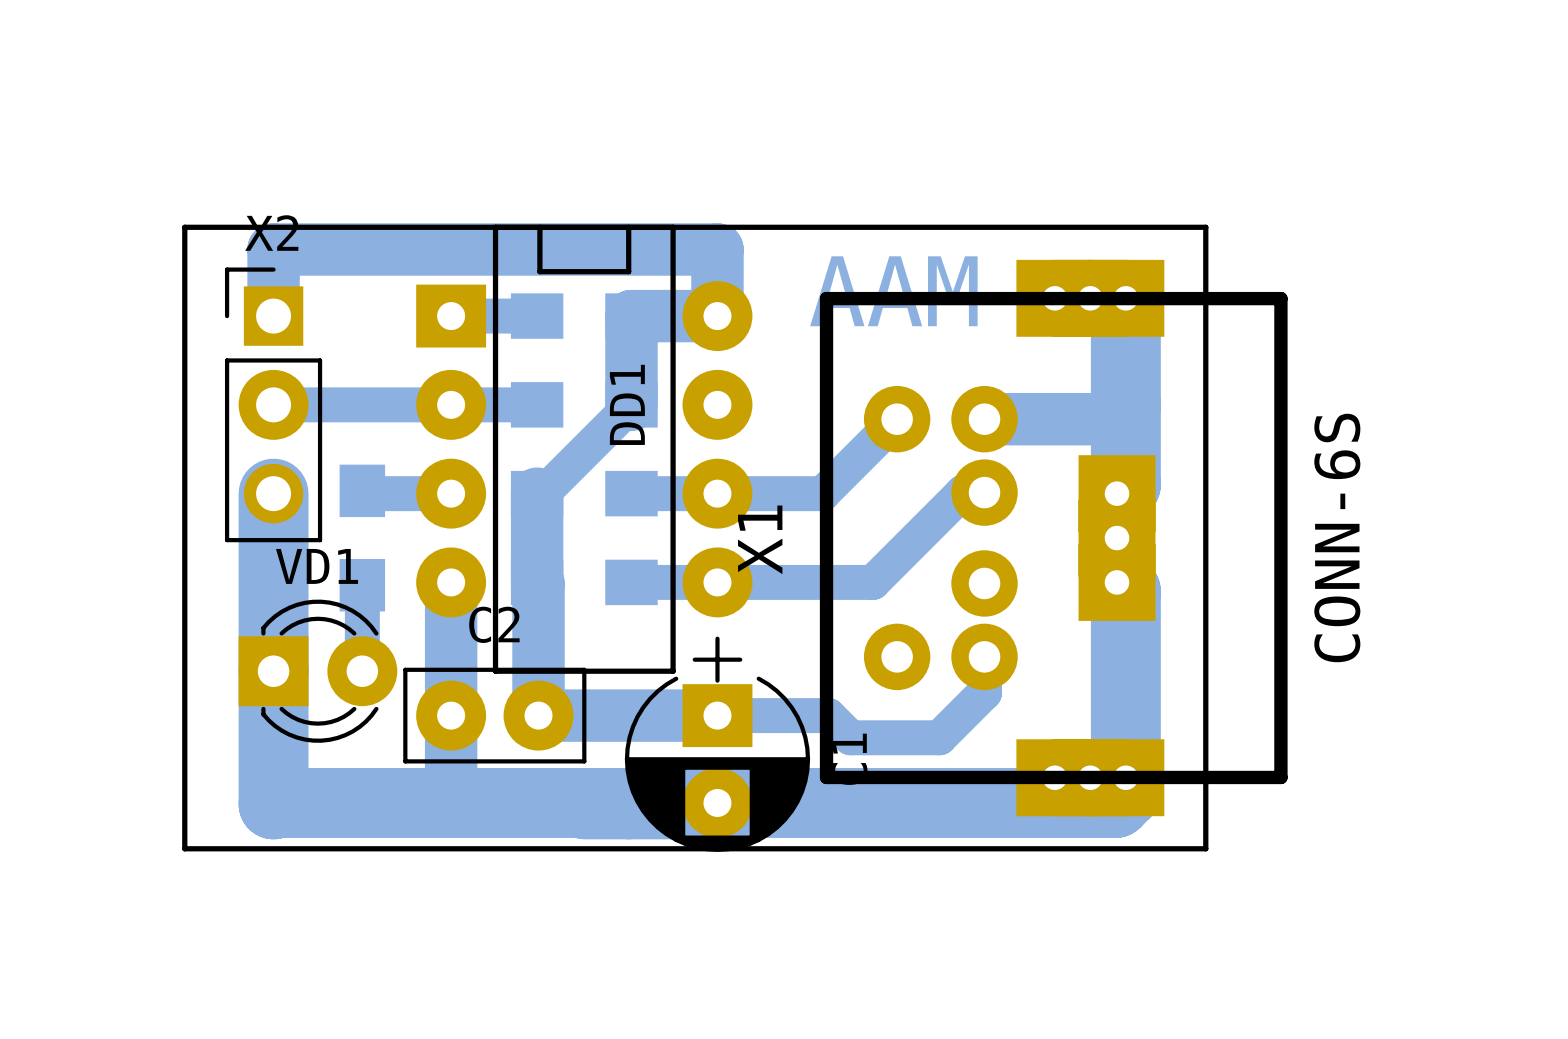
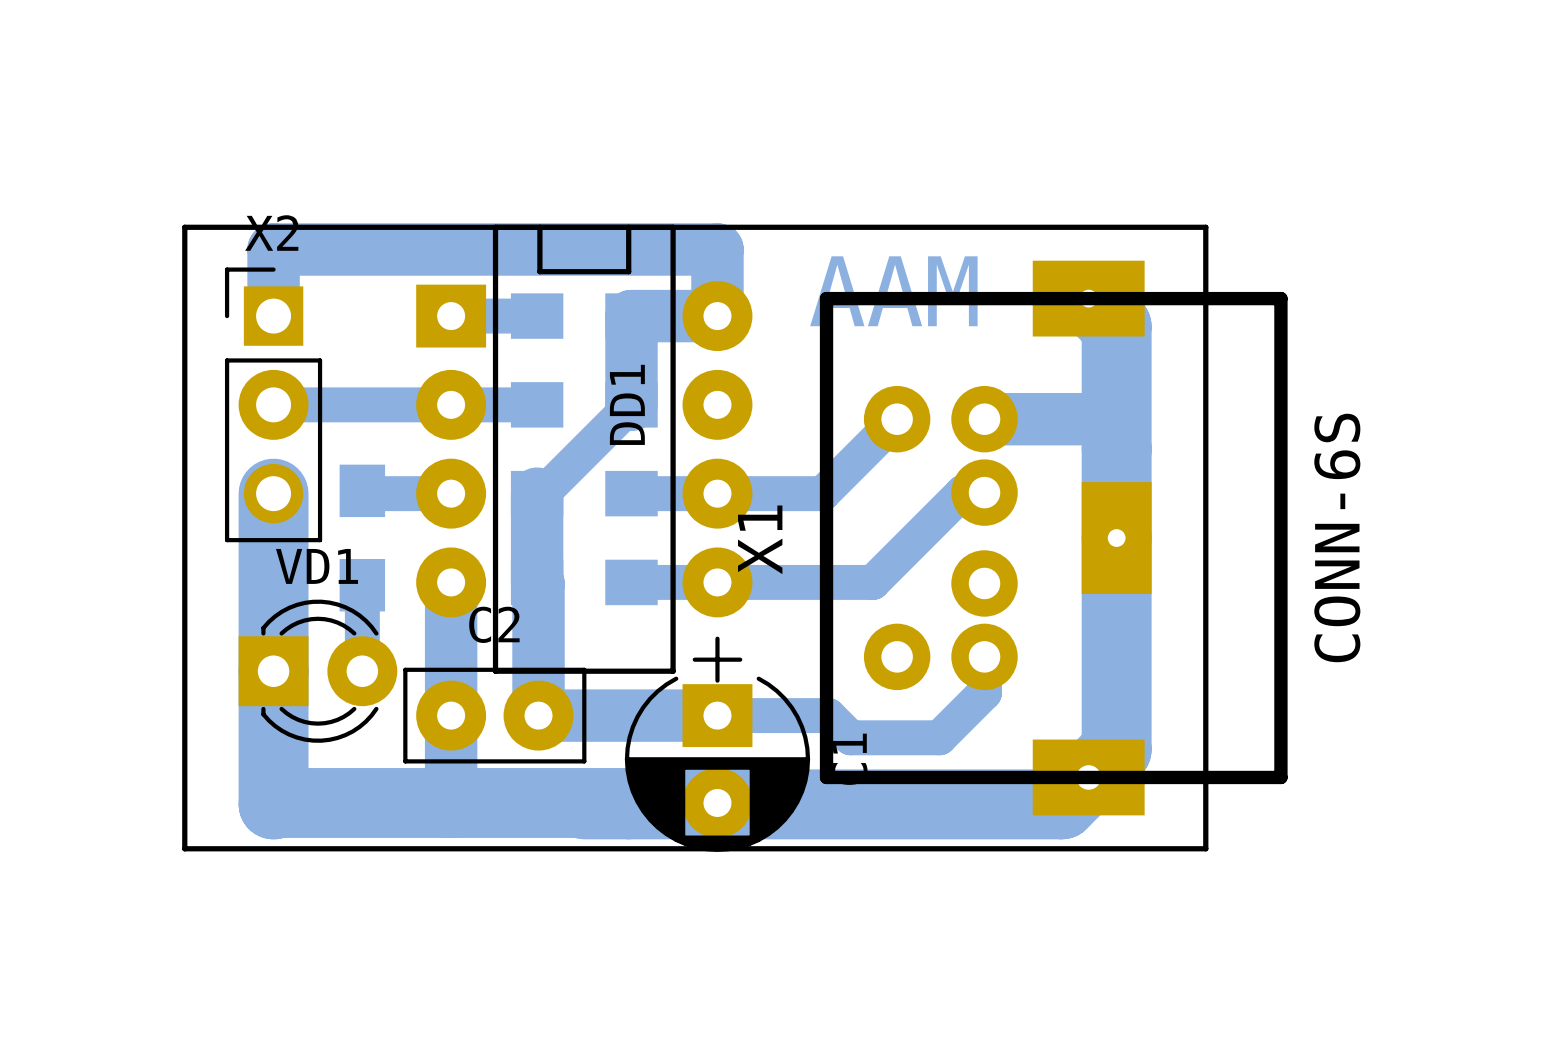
X1 footprint: [819, 259, 1288, 817] -> [819, 260, 1288, 816]
bottom track: (1054, 298) (1125, 298) (1125, 484) (1117, 493) (1117, 582) (1125, 591) (1125, 792) (1115, 802) (717, 802) -> (1088, 298) (1116, 326) (1116, 749) (1061, 804) (717, 804)

